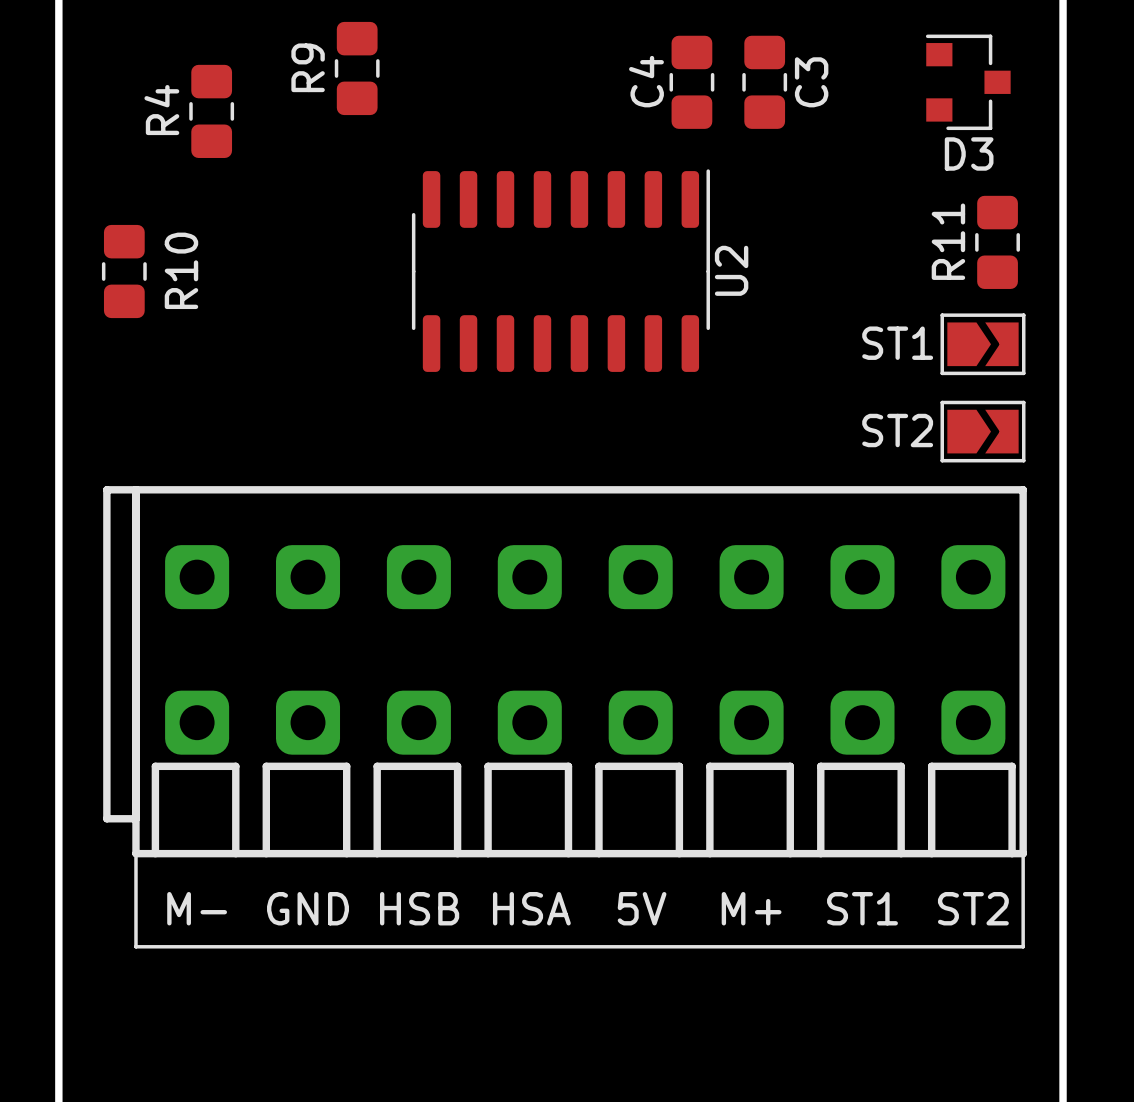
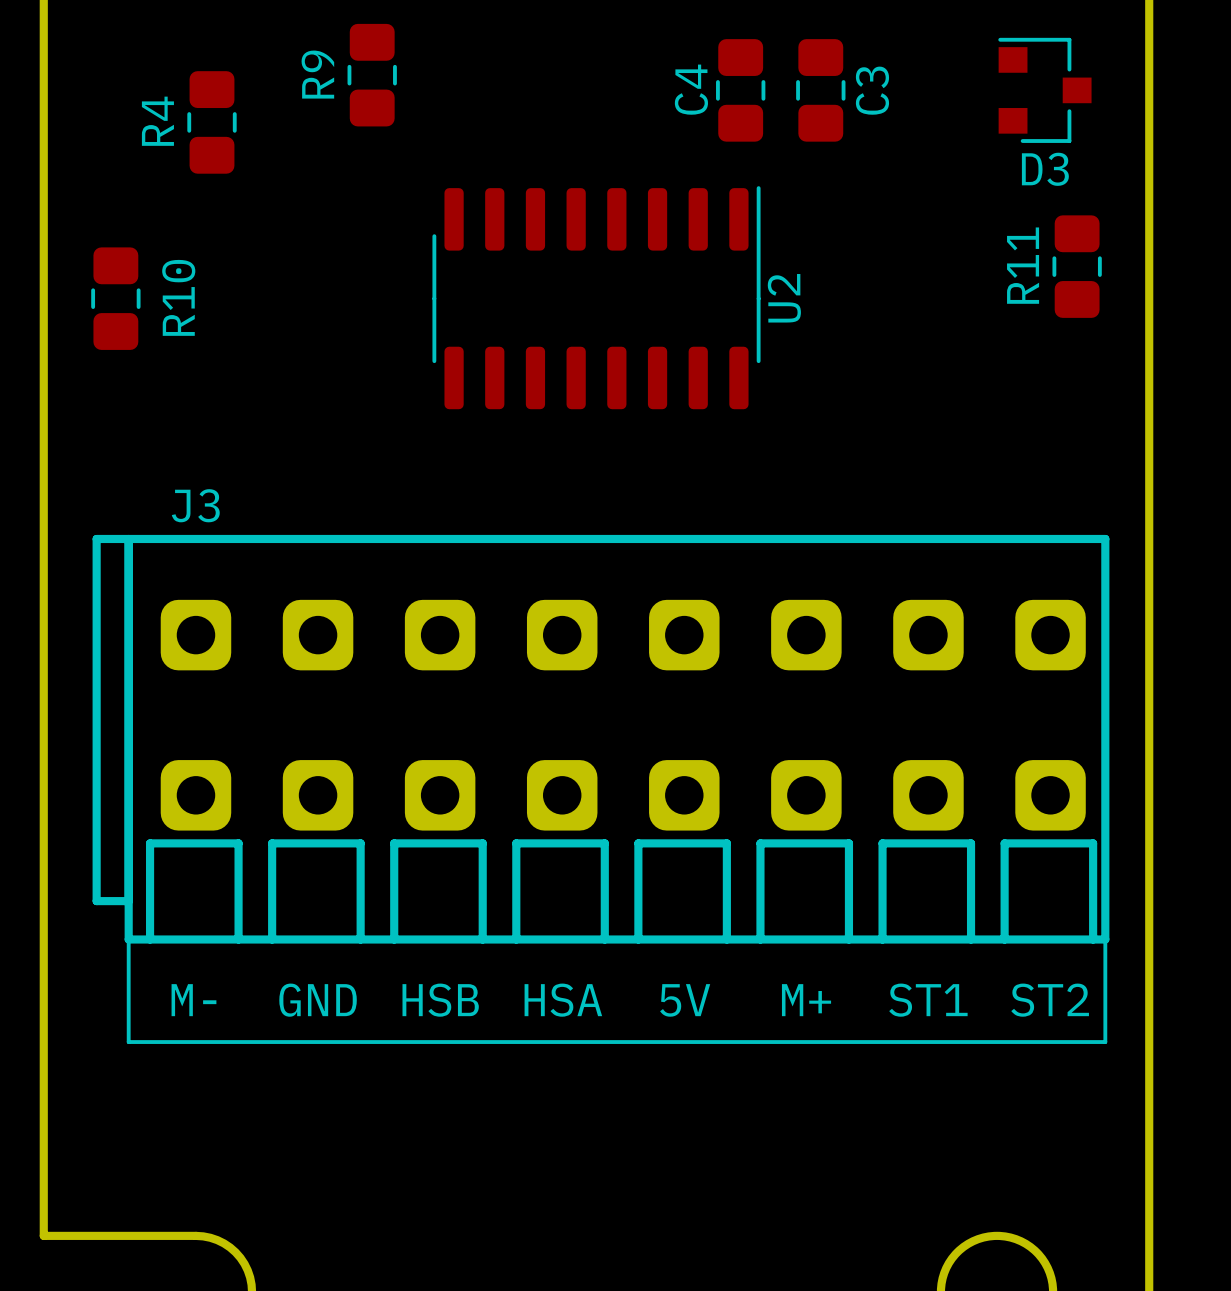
ST1: (982, 344) -> none
ST2: (982, 431) -> none
J3 name: none -> J3 (195, 505)

